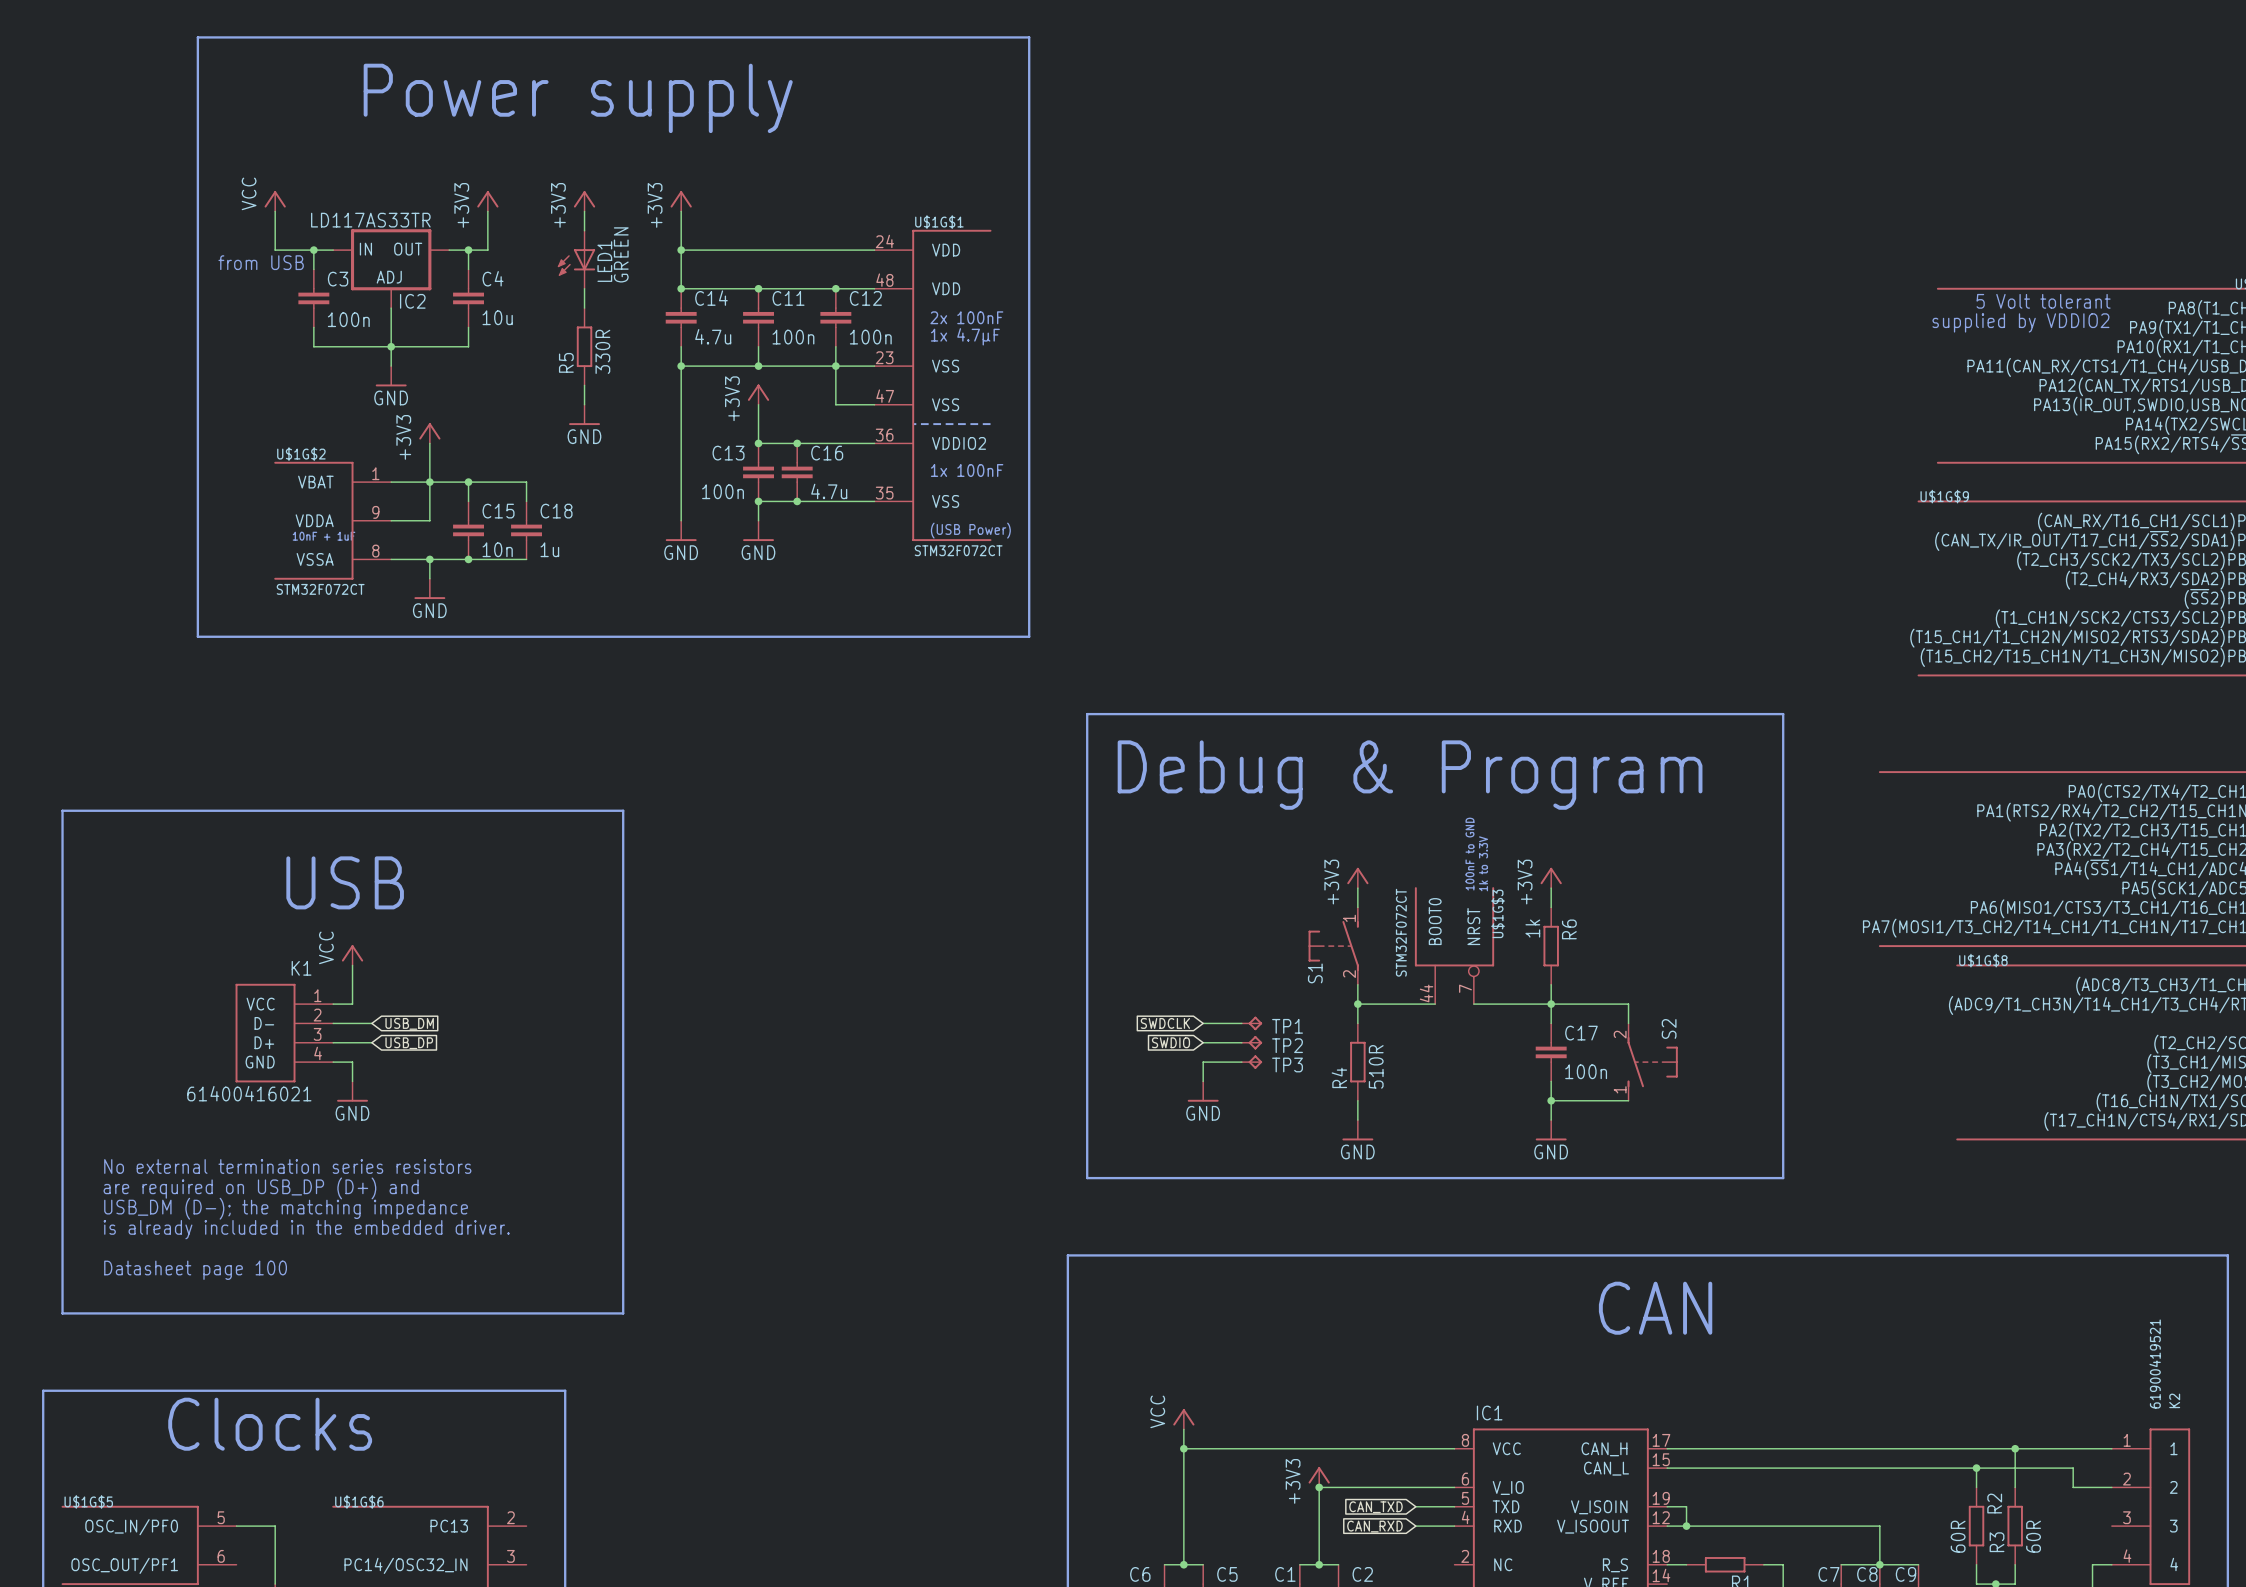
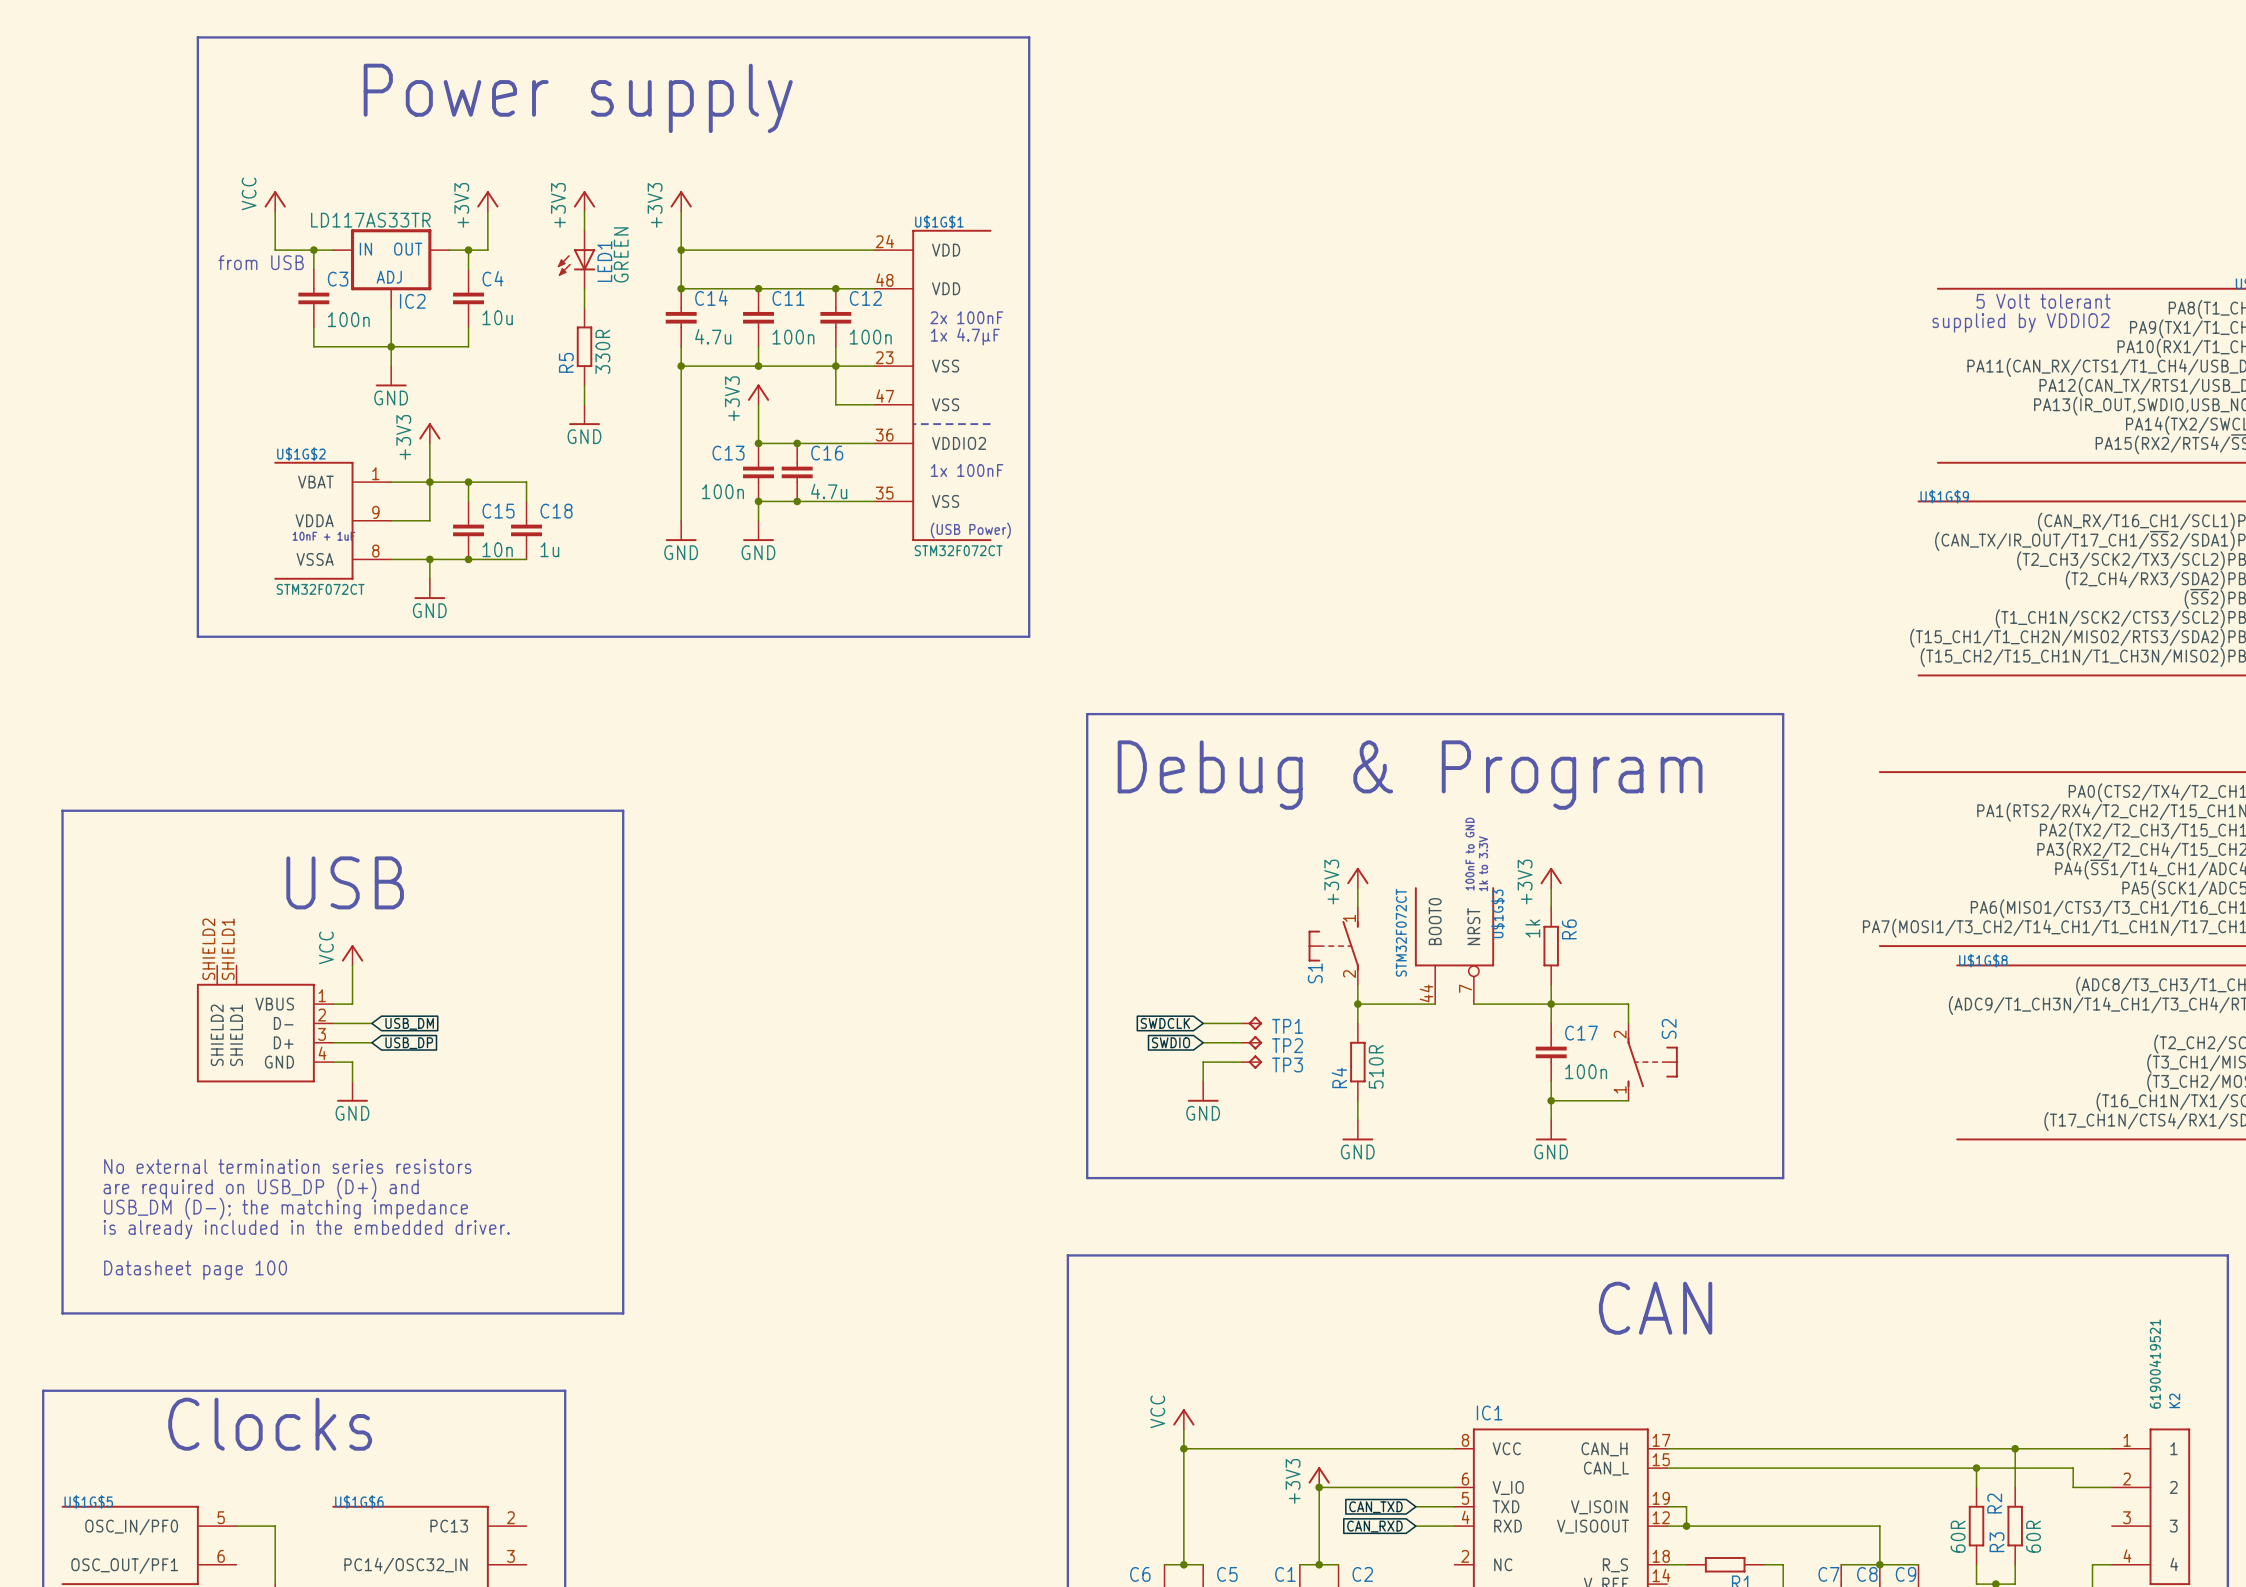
part: none -> (265, 1023)
K1: 61400416021 (284, 1033) -> none

